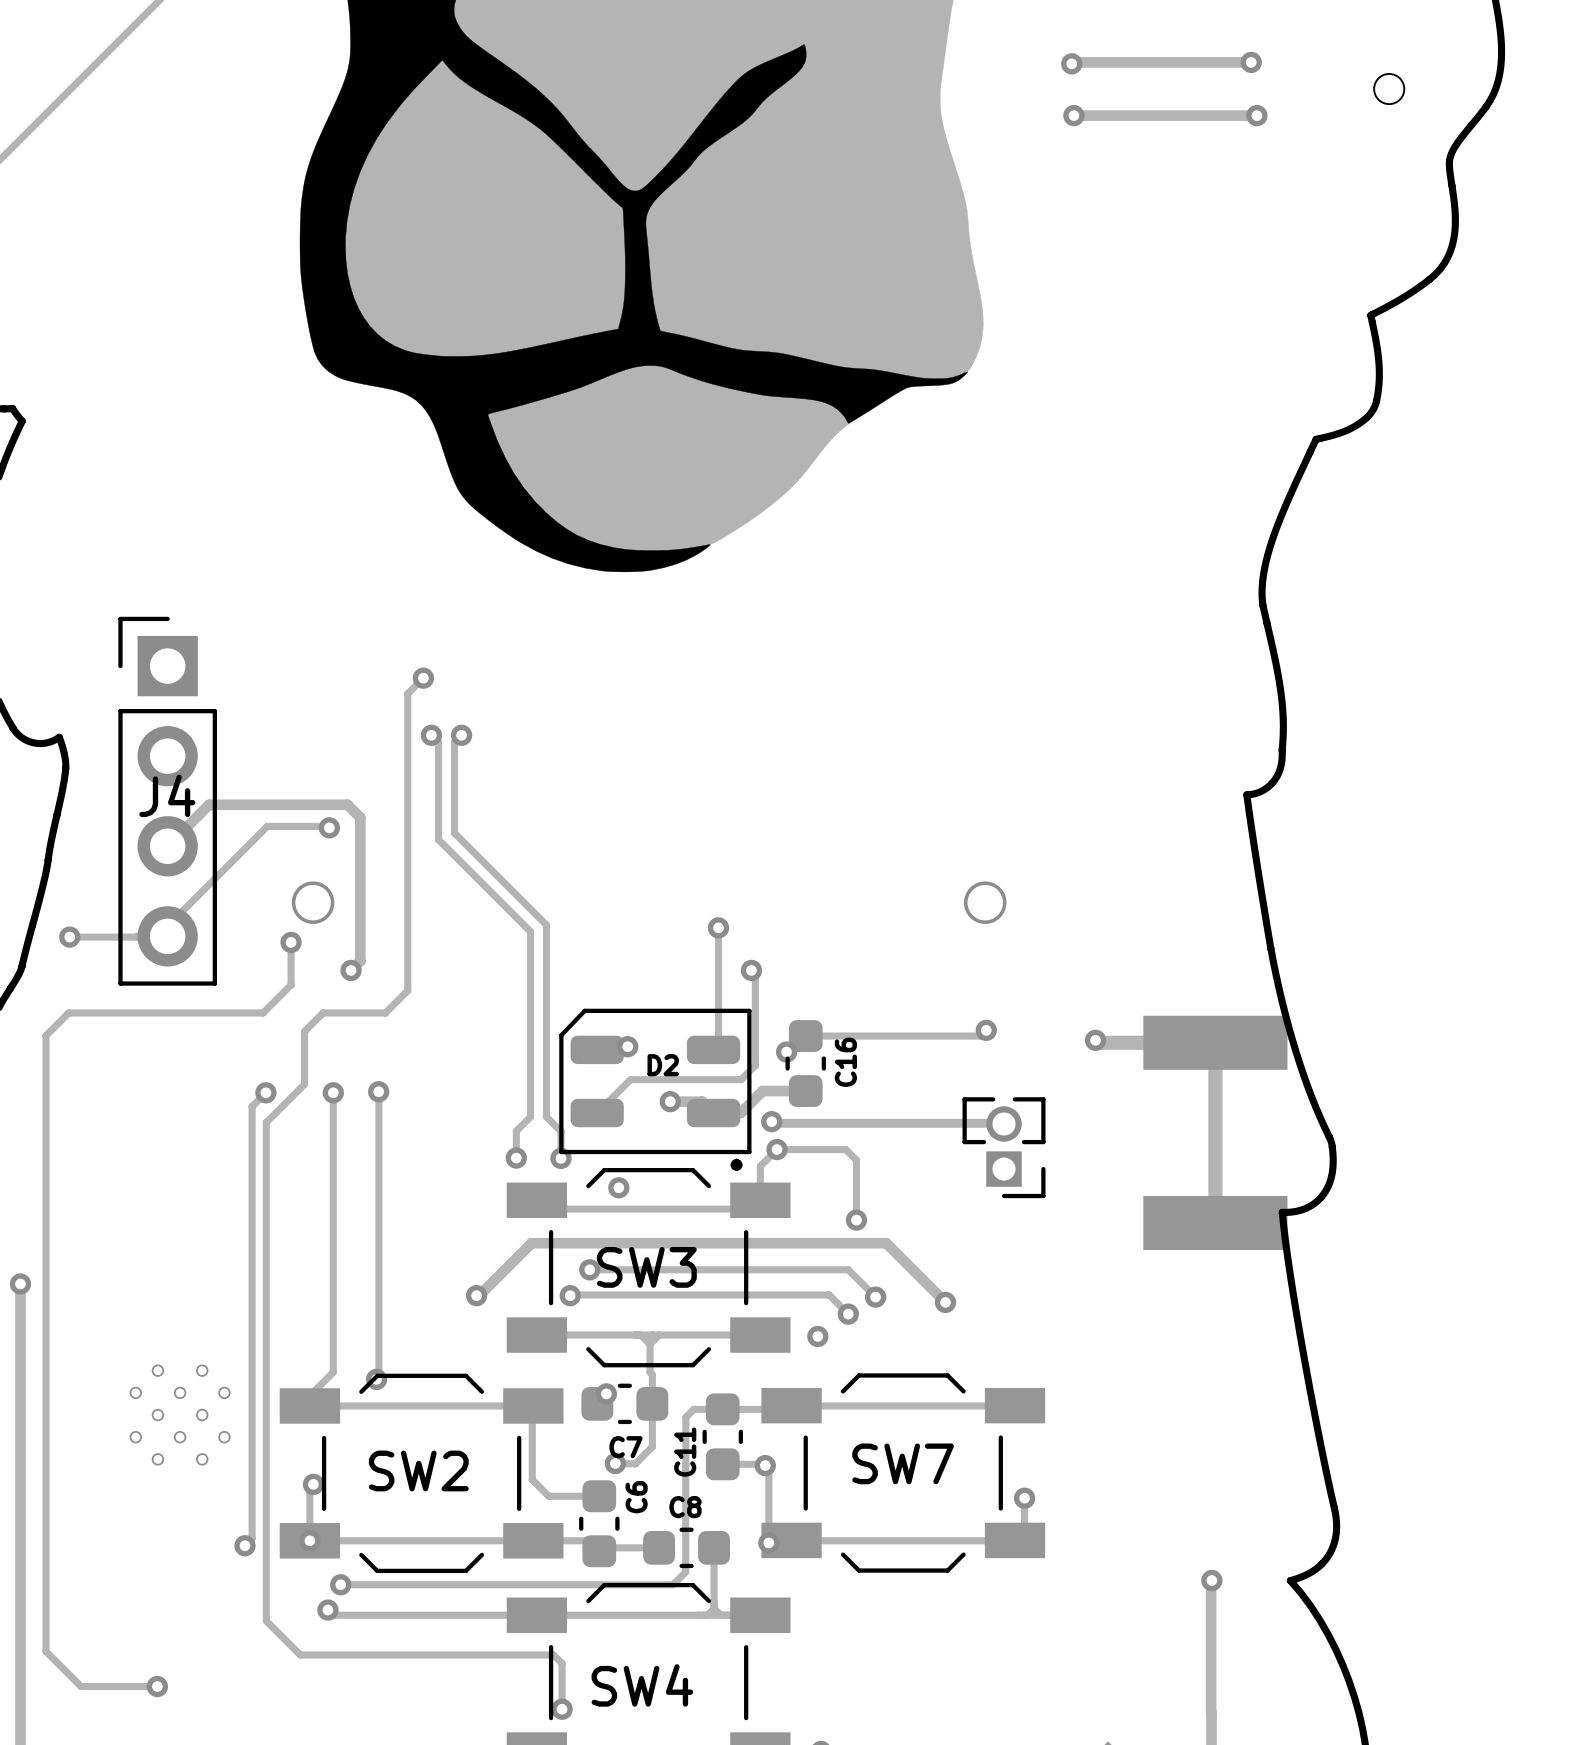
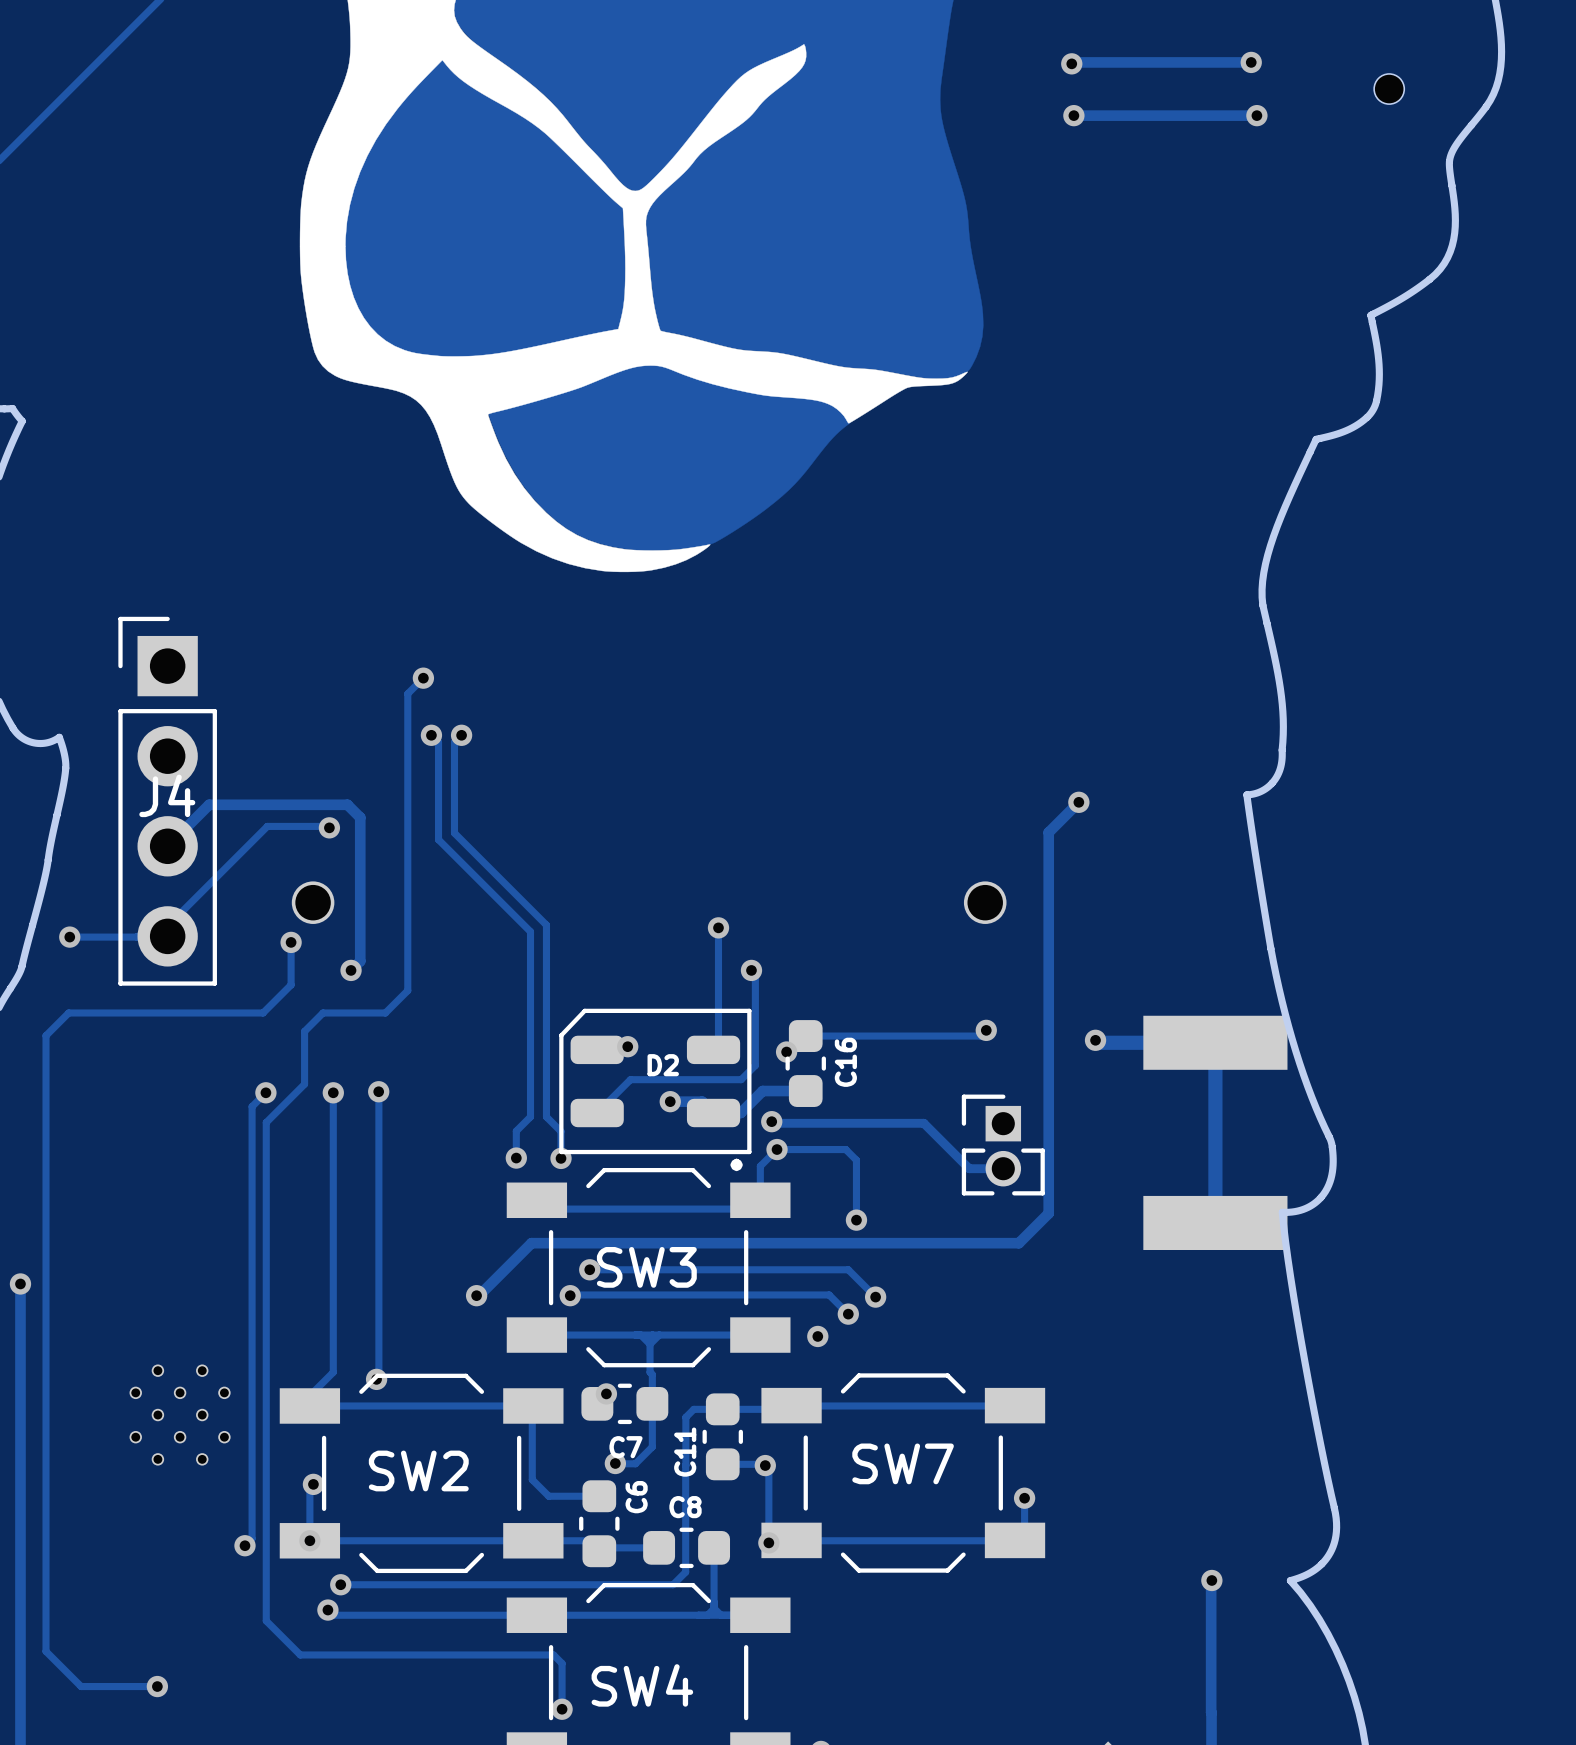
via: none -> (1078, 802)
track: (923, 1123) (1004, 1124) -> (923, 1123) (969, 1168) (1003, 1168)
part rotation: 0° (1004, 1147) -> 180° (1003, 1145)
via: (618, 1187) -> none
track: (886, 1243) (945, 1302) -> (886, 1243) (1018, 1243) (1048, 1213) (1048, 832) (1078, 802)
via: (945, 1302) -> none

